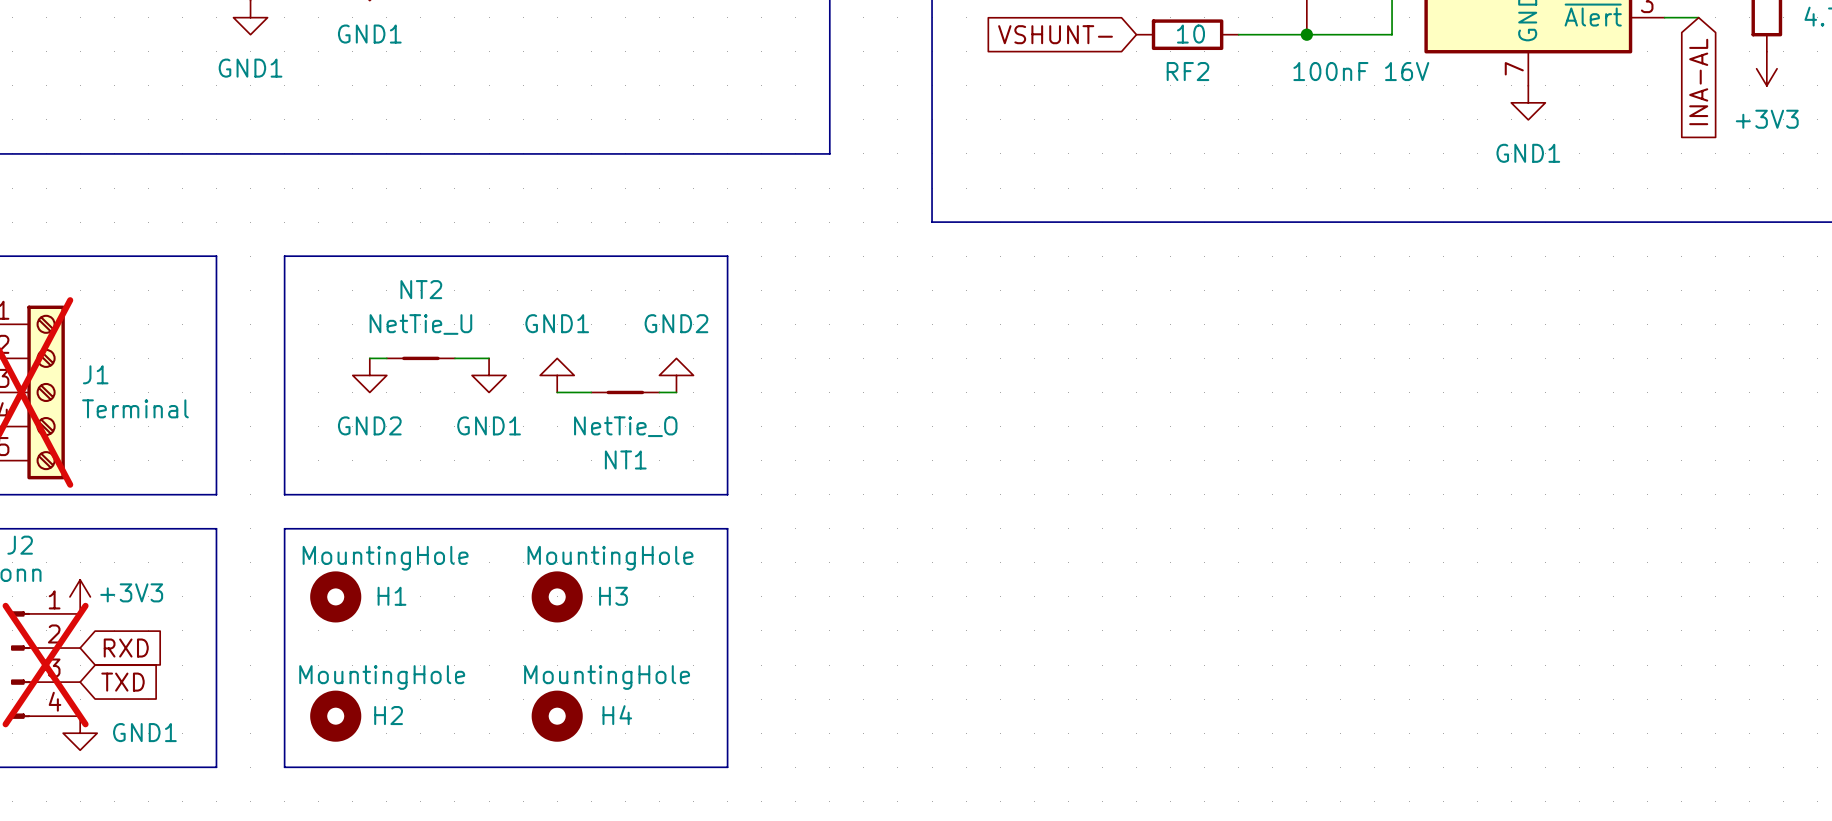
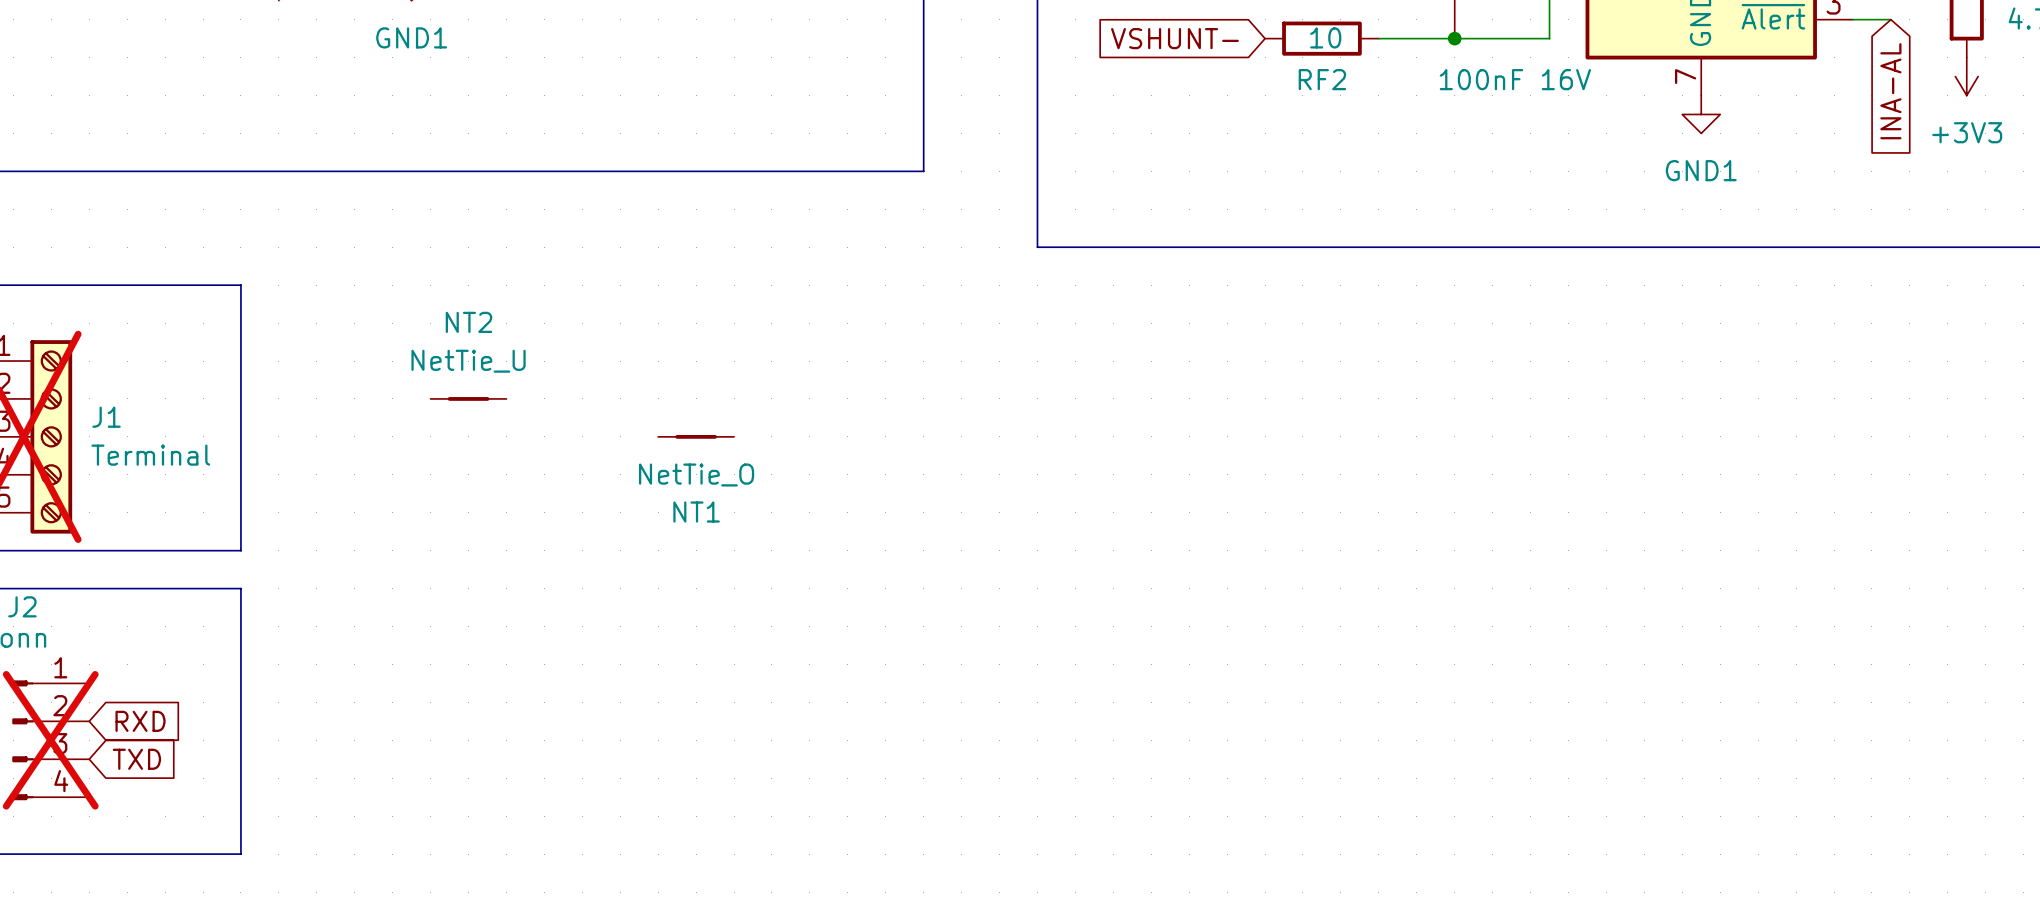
power symbol: GND1 (250, 17) -> none
line: (284, 256) (727, 256) (727, 494) (284, 494) (284, 256) -> none
wire: (369, 358) (386, 358) -> none
wire: (454, 358) (489, 358) -> none
power symbol: GND2 (369, 375) -> none
power symbol: GND1 (489, 375) -> none
power symbol: GND1 (557, 375) -> none
power symbol: GND2 (676, 375) -> none
wire: (557, 392) (591, 392) -> none
wire: (659, 392) (676, 392) -> none
line: (284, 528) (284, 767) (727, 767) (727, 528) (284, 528) -> none
power symbol: +3V3 (80, 596) -> none
H1: MountingHole (335, 596) -> none
H3: MountingHole (557, 596) -> none
H2: MountingHole (335, 716) -> none
H4: MountingHole (557, 716) -> none
power symbol: GND1 (80, 733) -> none

